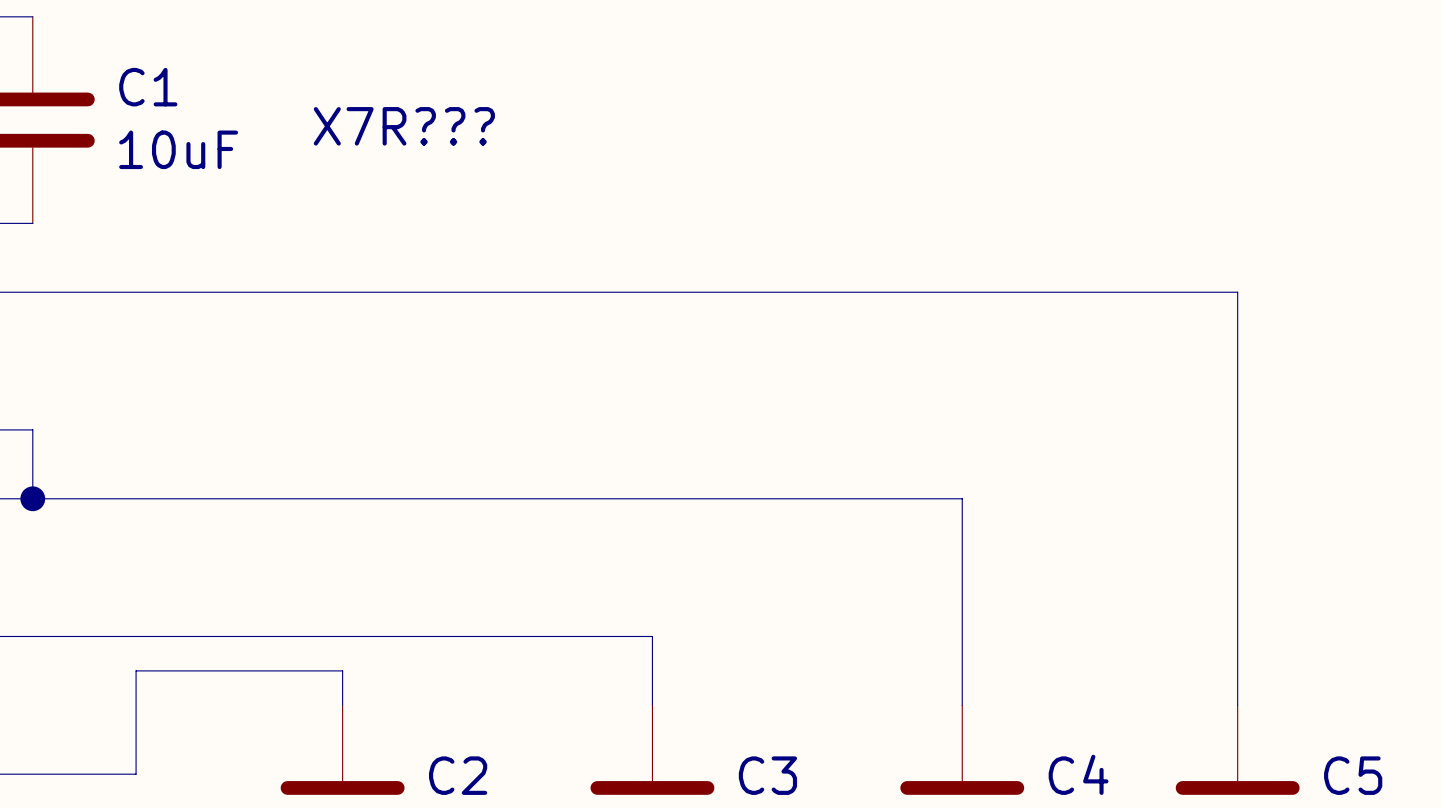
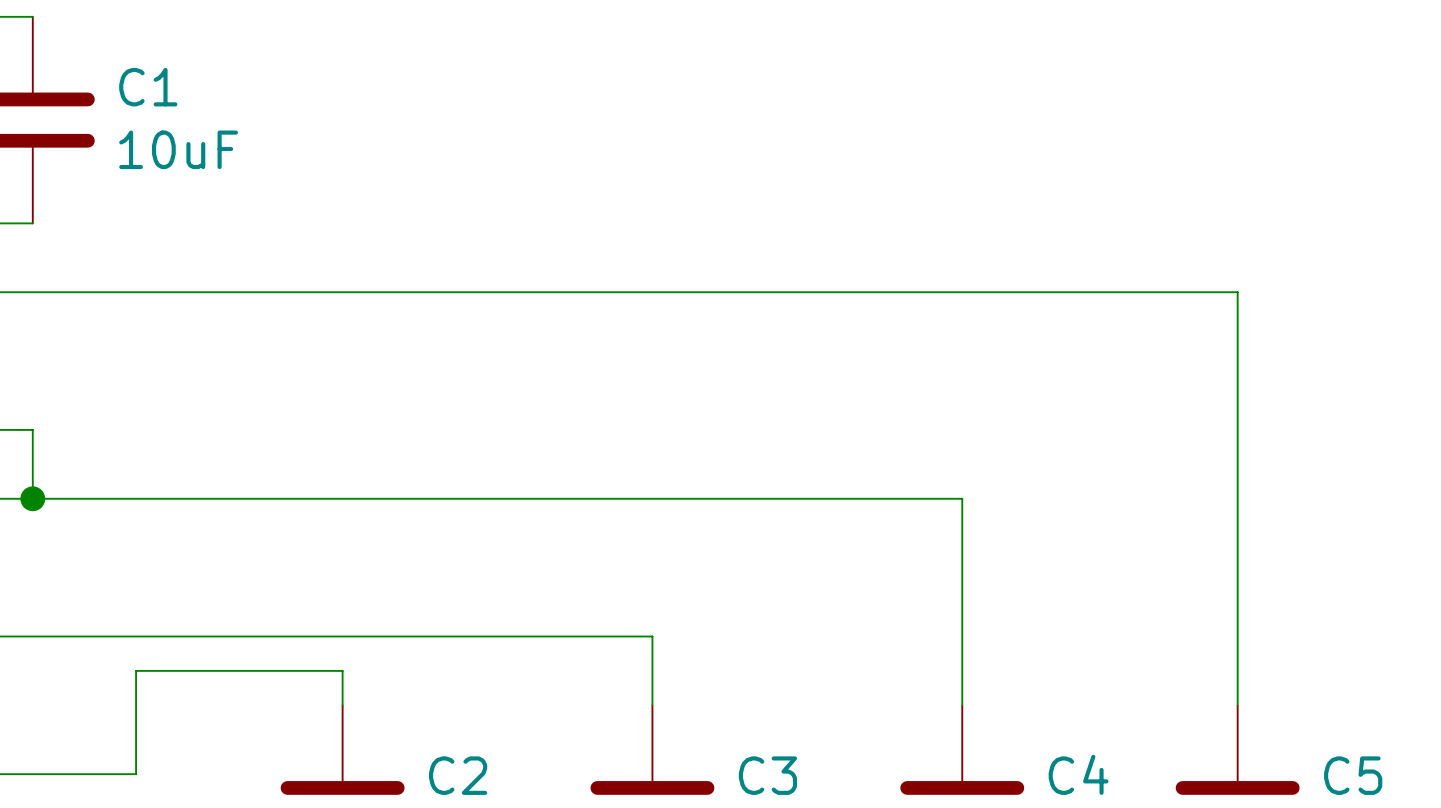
text: X7R??? (404, 126) -> none

